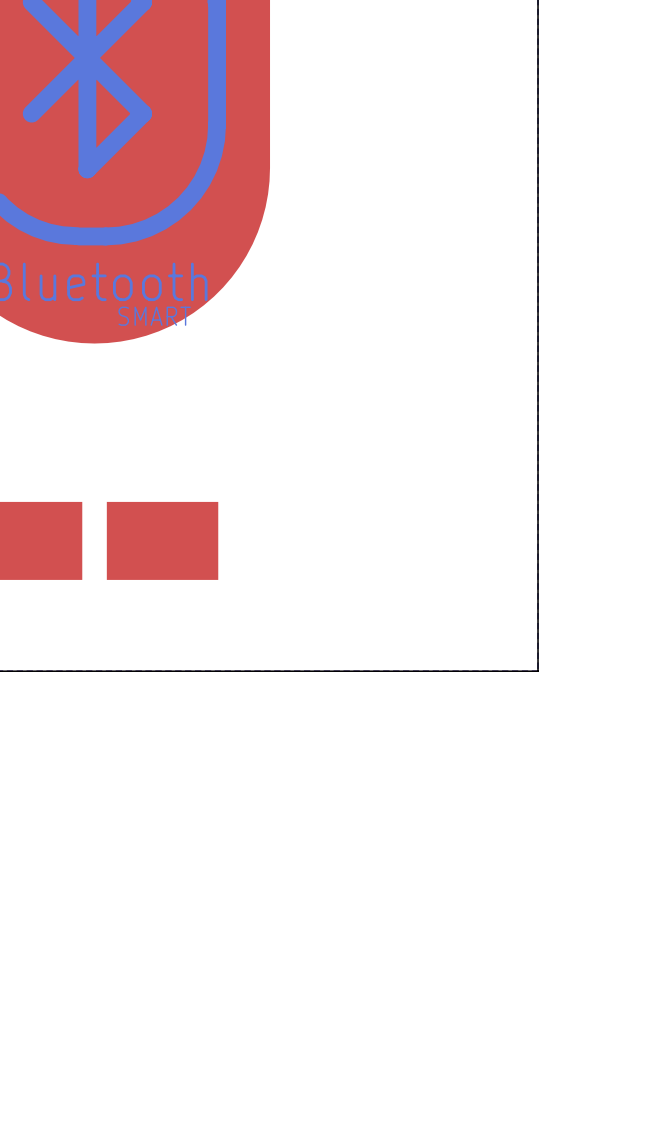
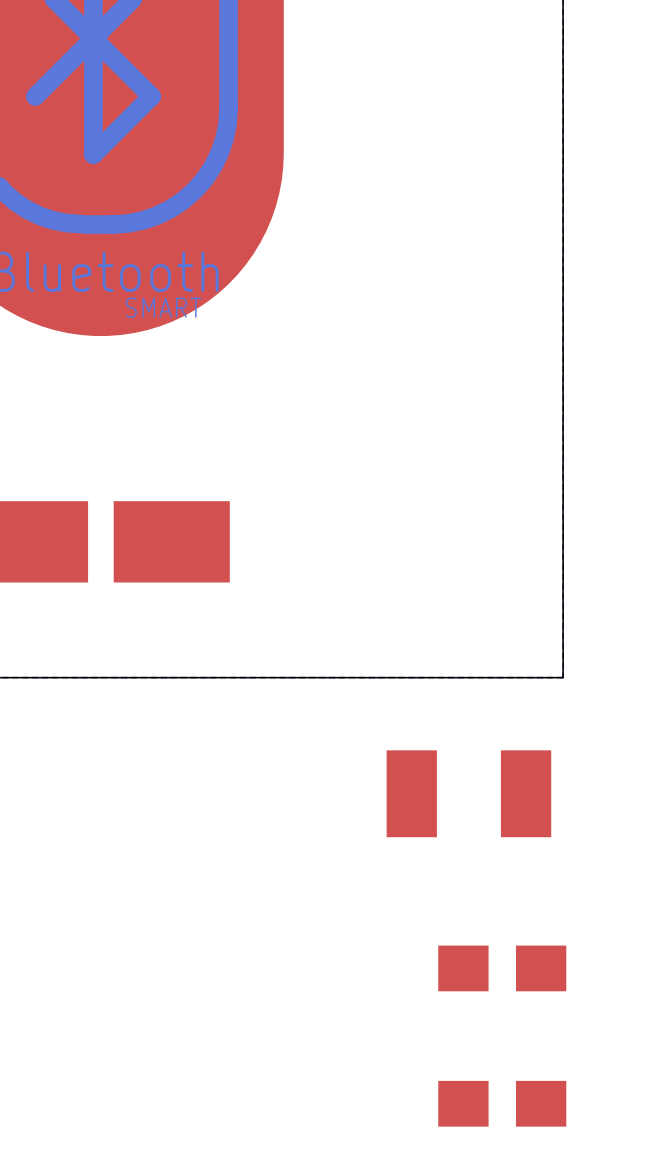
part: none -> (468, 793)
part: none -> (502, 968)
part: none -> (502, 1103)

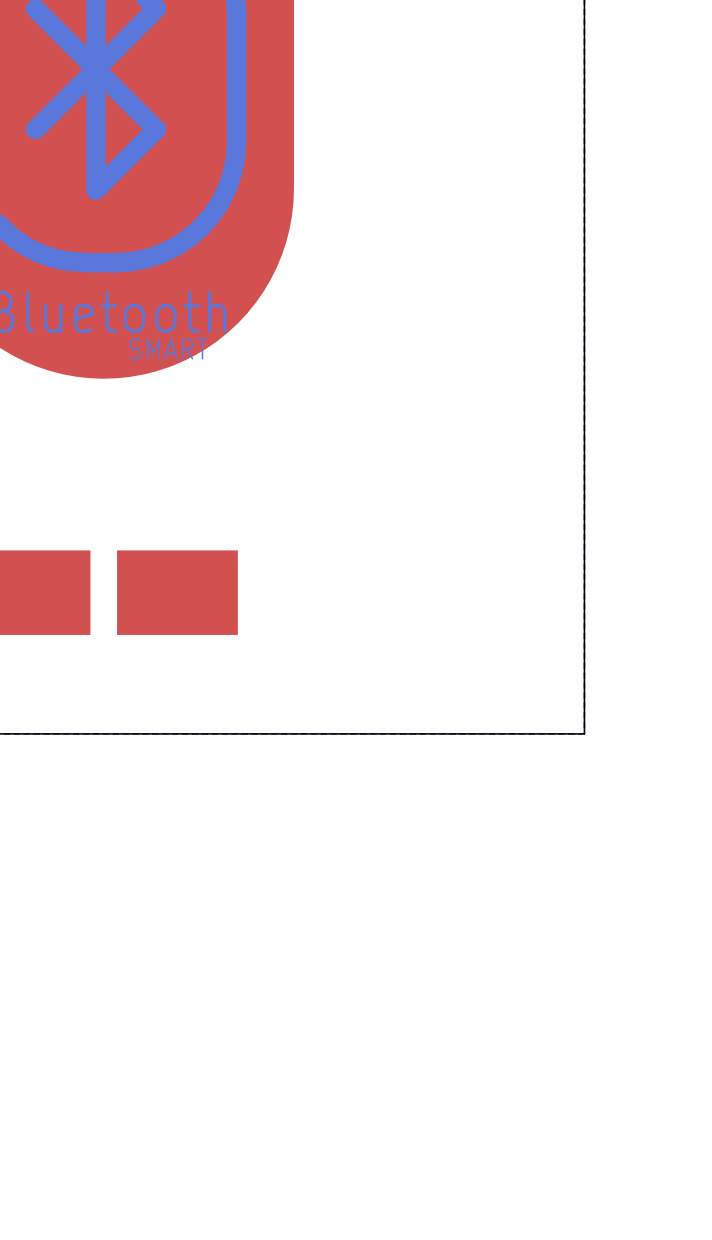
part: (468, 793) -> none
part: (502, 968) -> none
part: (502, 1103) -> none

